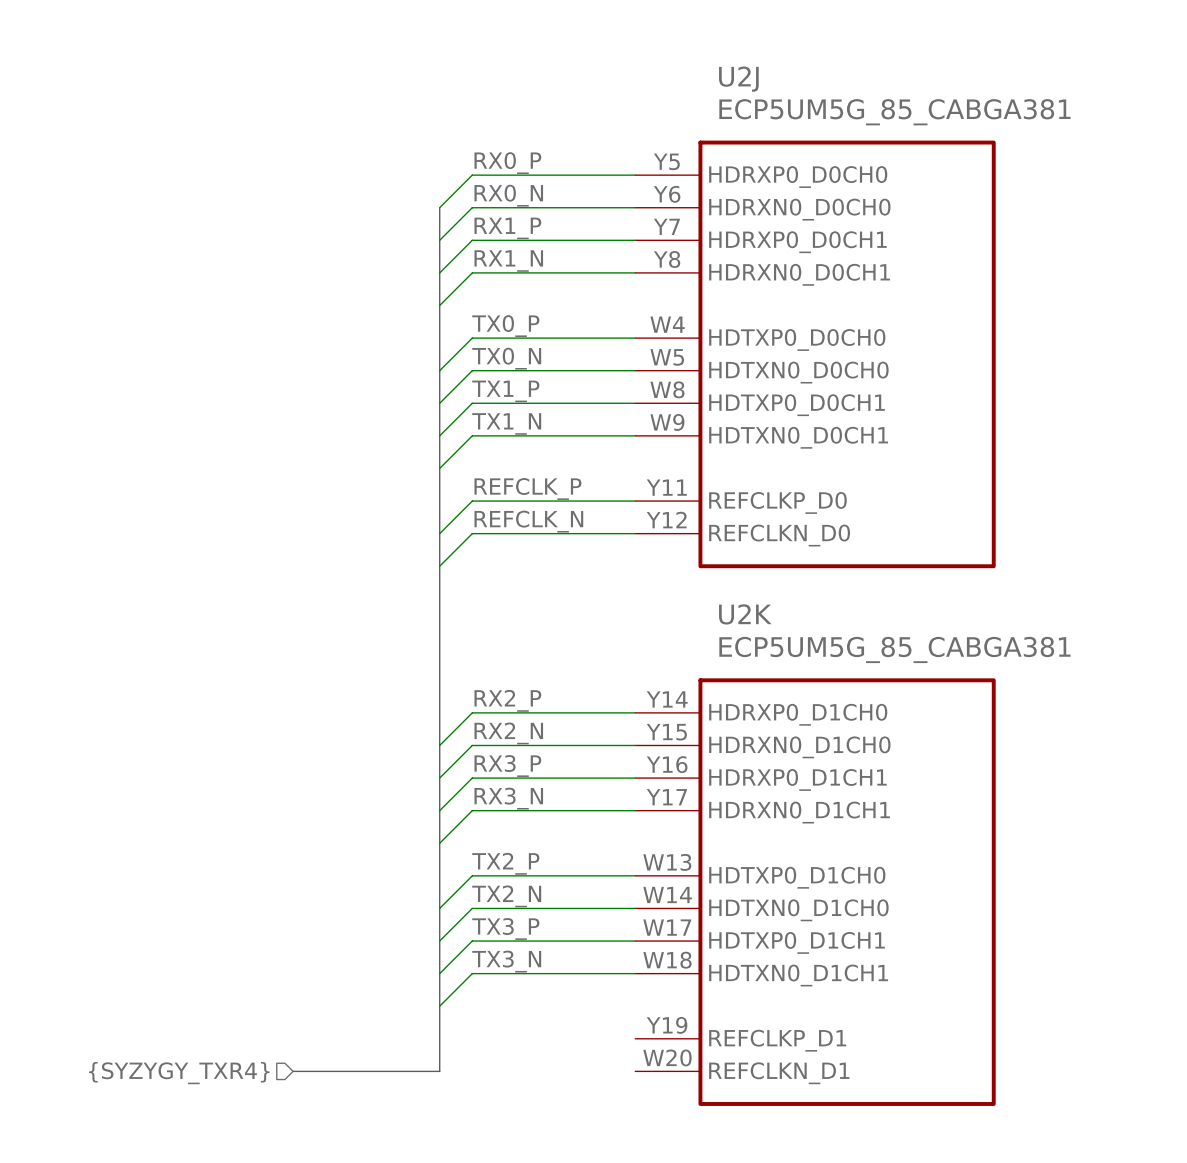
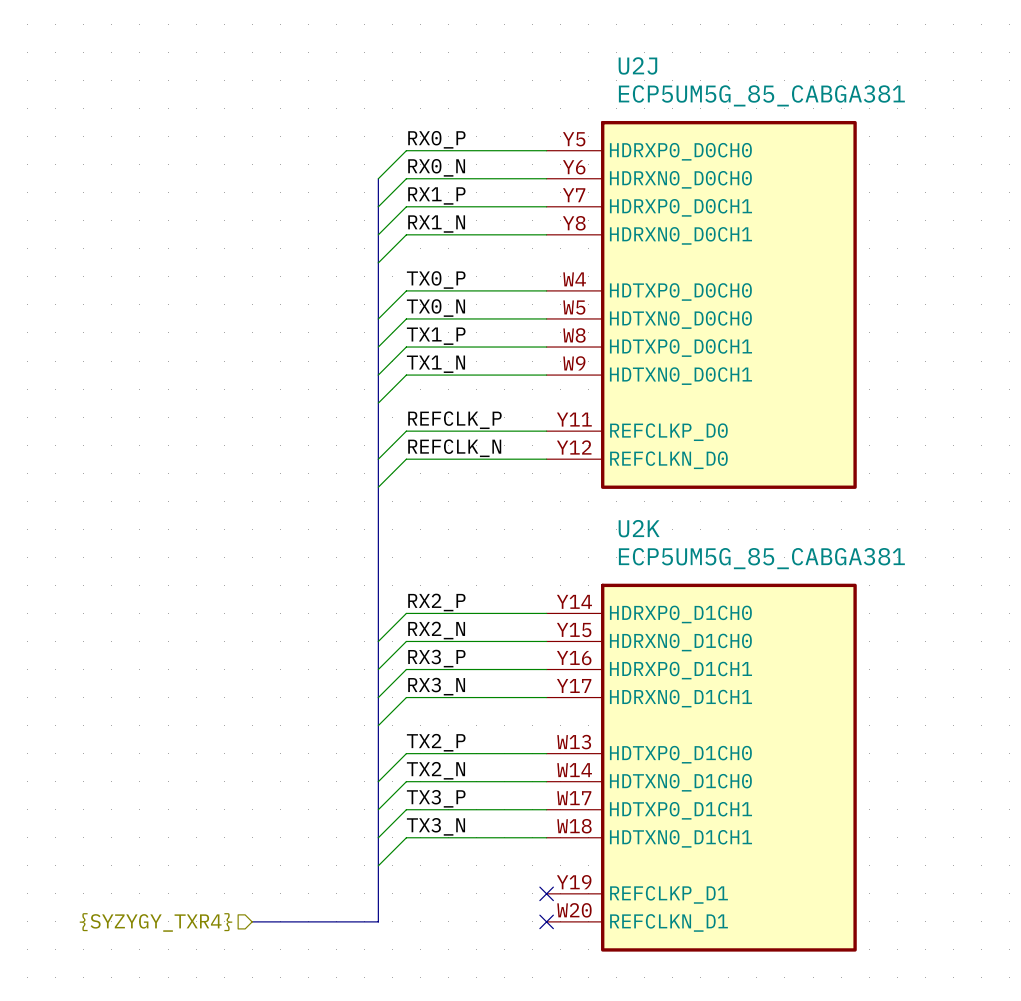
no-connect mark: none -> (546, 893)
no-connect mark: none -> (546, 921)

